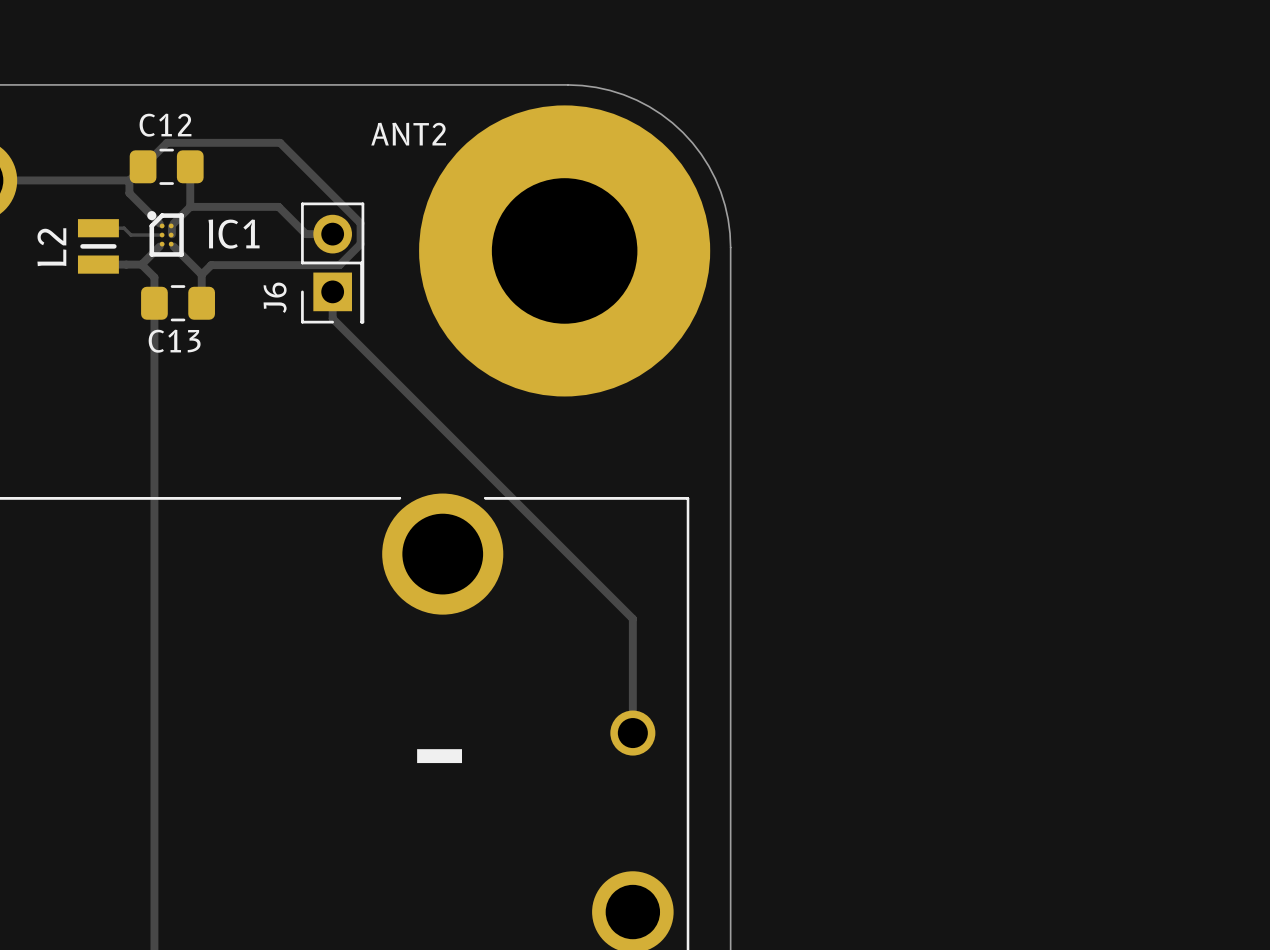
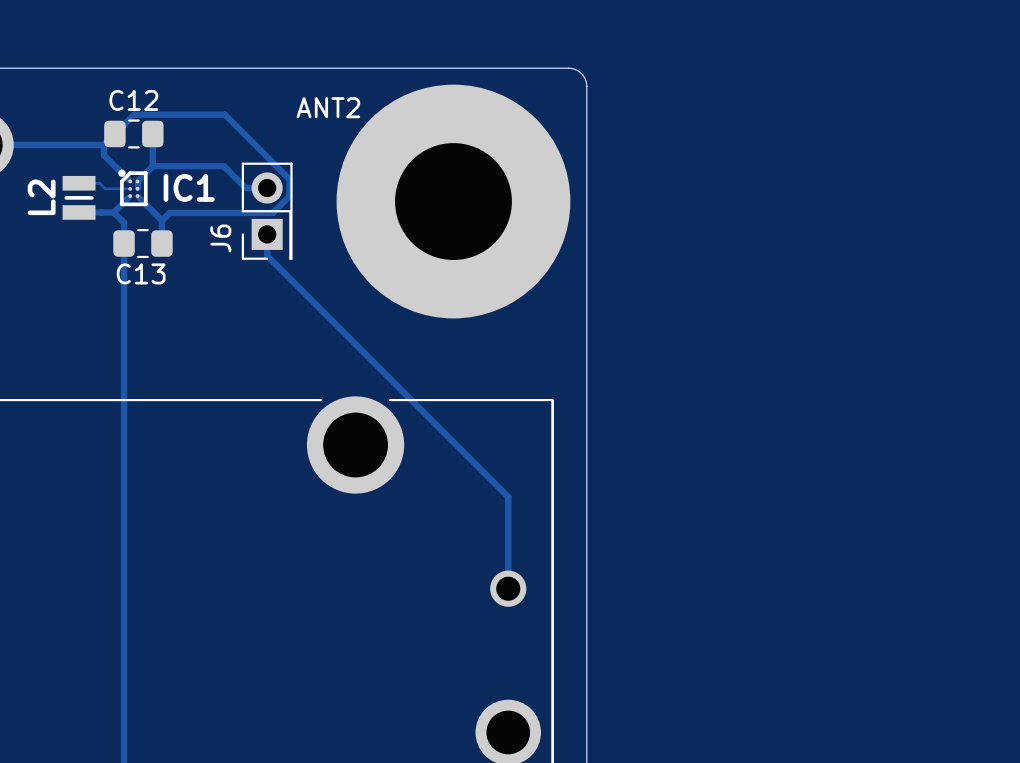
board edge: (568, 84) (596, 87) (623, 94) (649, 106) (683, 132) (701, 154) (715, 178) (725, 205) (730, 247) -> (456, 68) (568, 68) (581, 73) (586, 86) (586, 198)
text: - (439, 756) -> none

